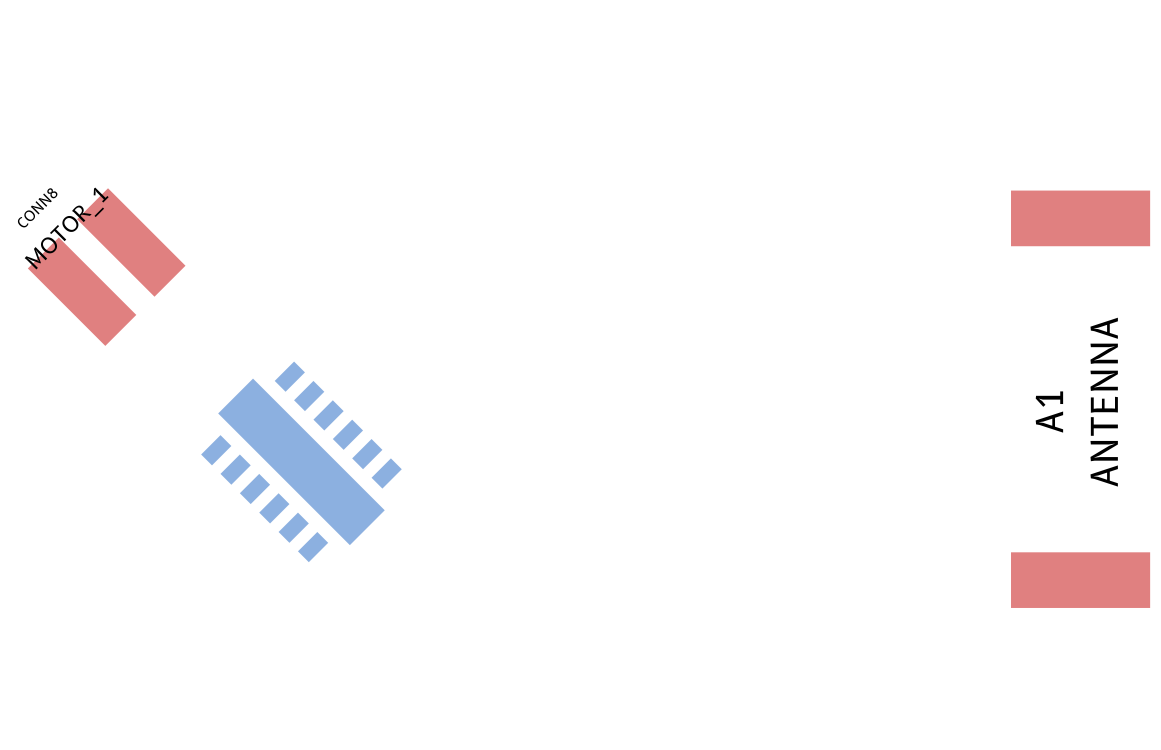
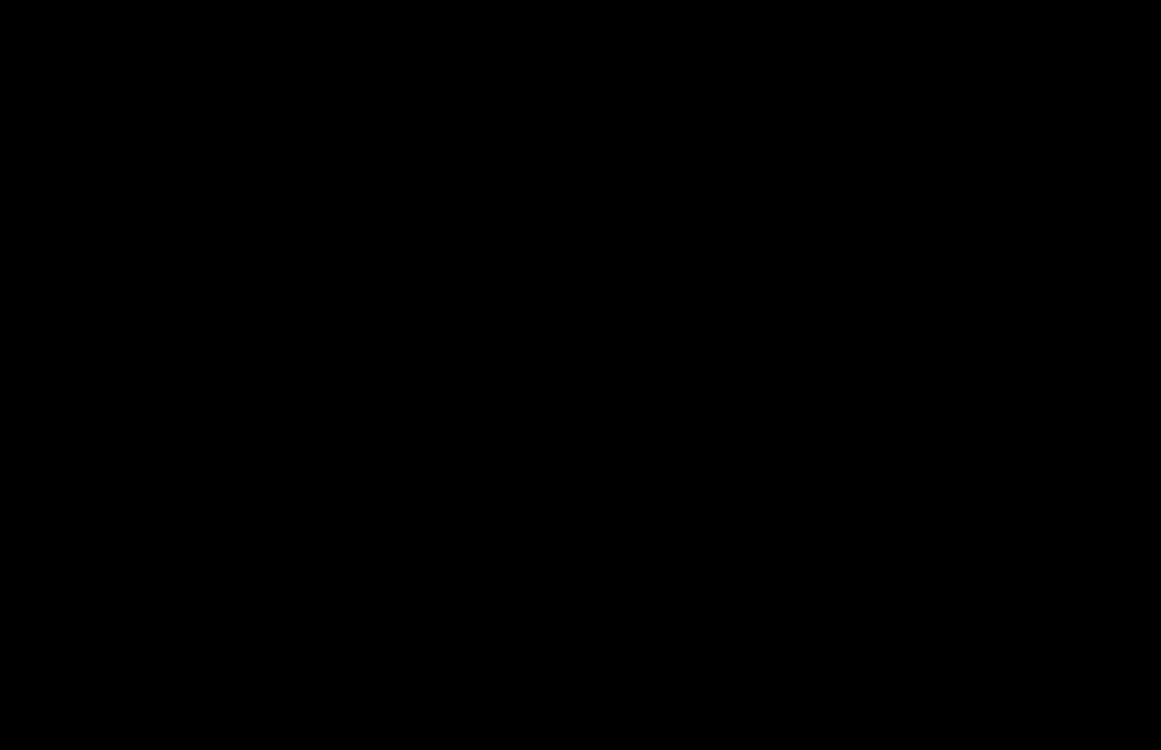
CONN8: MOTOR_1 (106, 267) -> none
A1: ANTENNA (1080, 399) -> none
part: (301, 461) -> none

